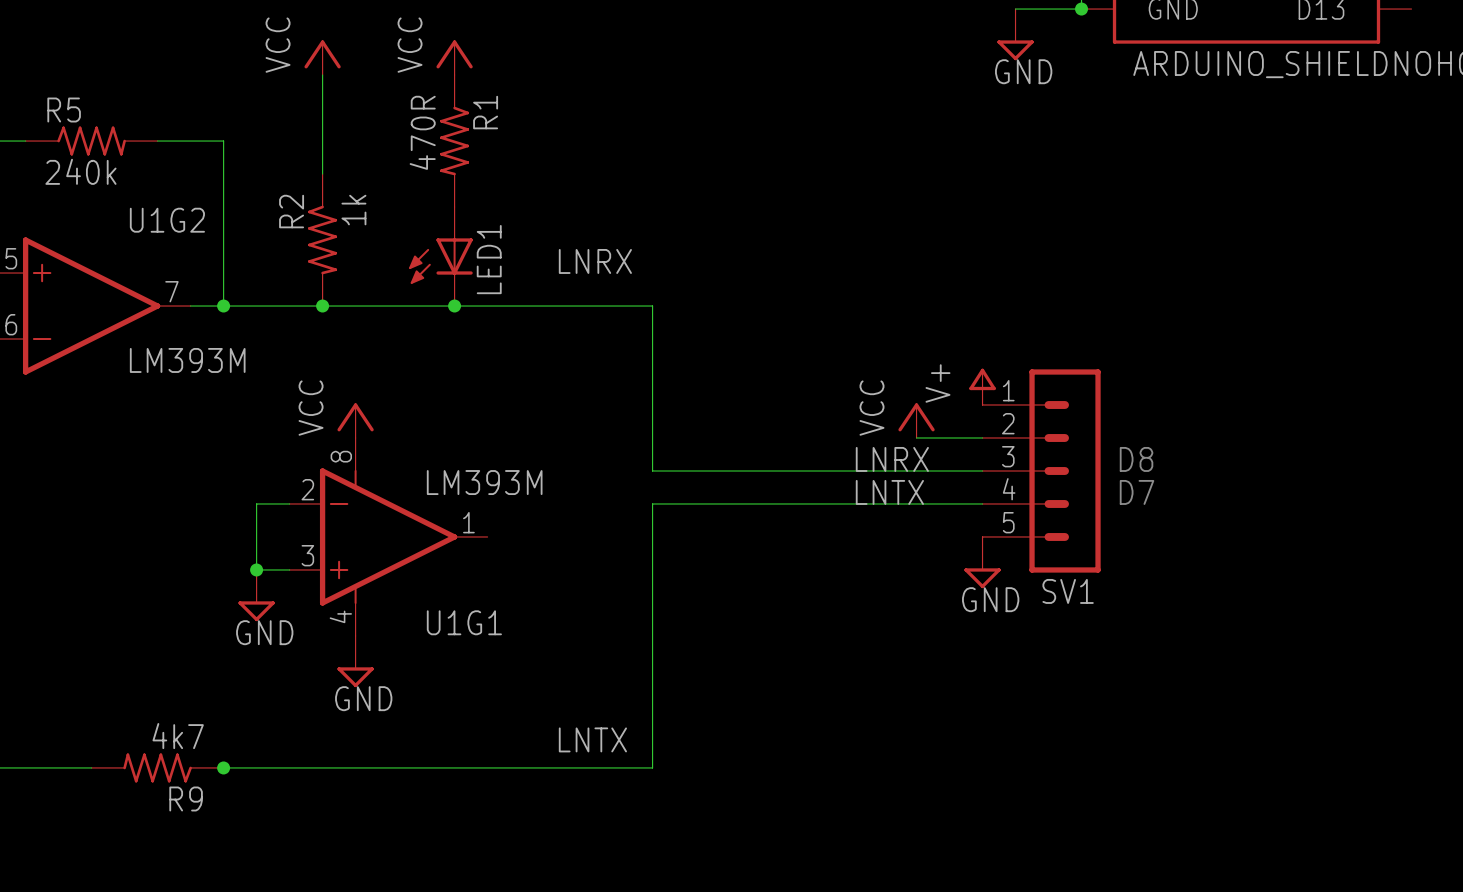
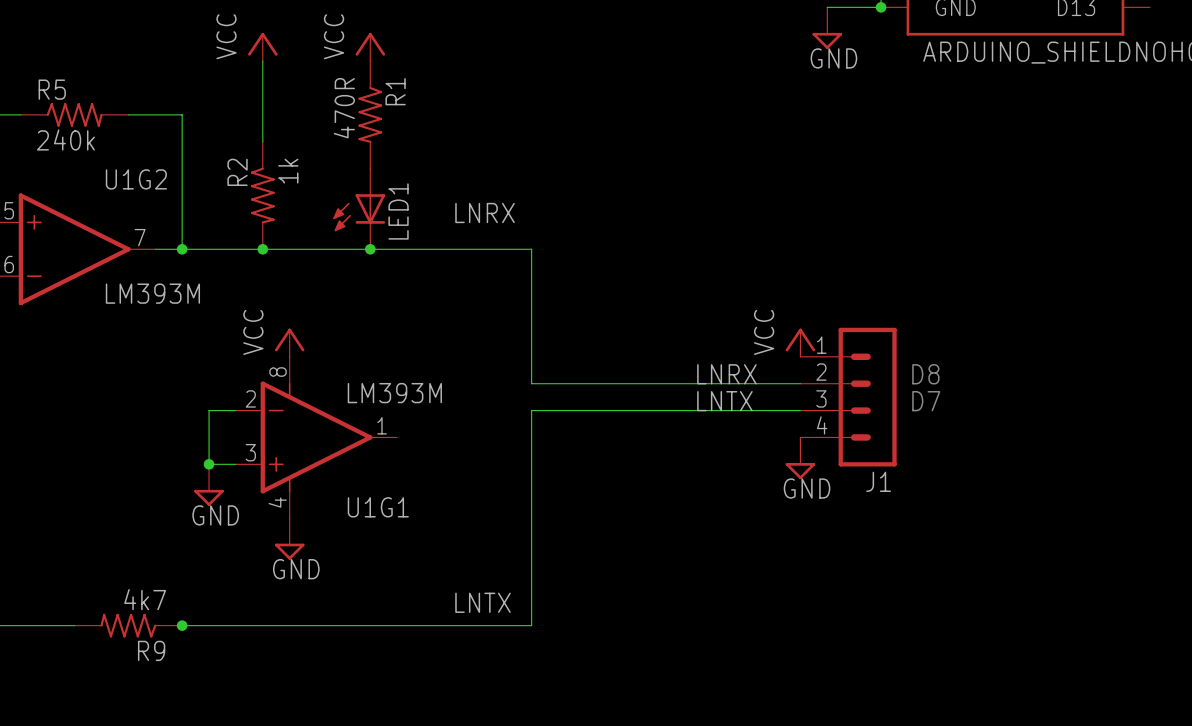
power symbol: V+ (982, 386) -> none
power symbol position: VCC (916, 420) -> VCC (800, 342)
wire: (916, 437) (982, 437) -> none
SV1: (1041, 470) -> none
J1: none -> (848, 397)

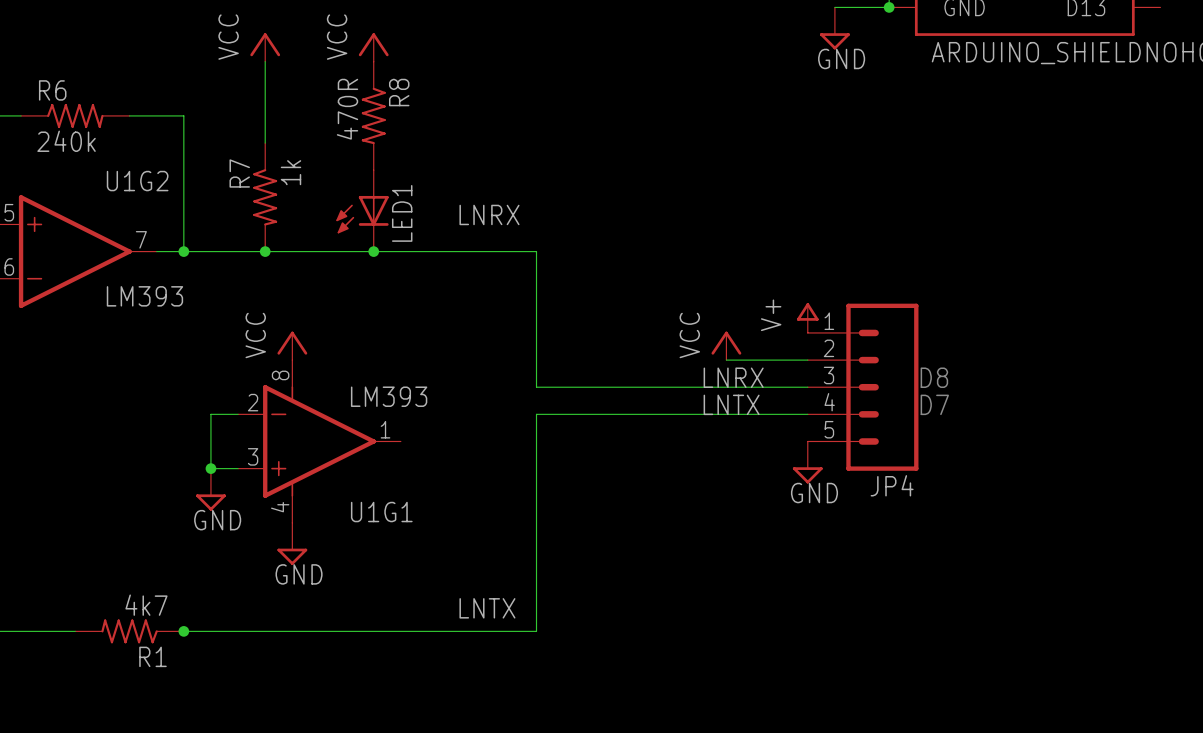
R5 name: R5 (52, 89) -> R6 (52, 90)
R1 name: R1 (395, 91) -> R8 (399, 92)
R2 name: R2 (237, 172) -> R7 (239, 173)
U1G2 value: LM393M (152, 293) -> LM393 (144, 296)
power symbol: none -> V+ (807, 318)
power symbol position: VCC (800, 342) -> VCC (726, 345)
wire: none -> (726, 360) (807, 360)
JP4: none -> (863, 387)
U1G1 value: LM393M (394, 393) -> LM393 (389, 396)
J1: (848, 397) -> none
R9 name: R9 (151, 650) -> R1 (152, 656)

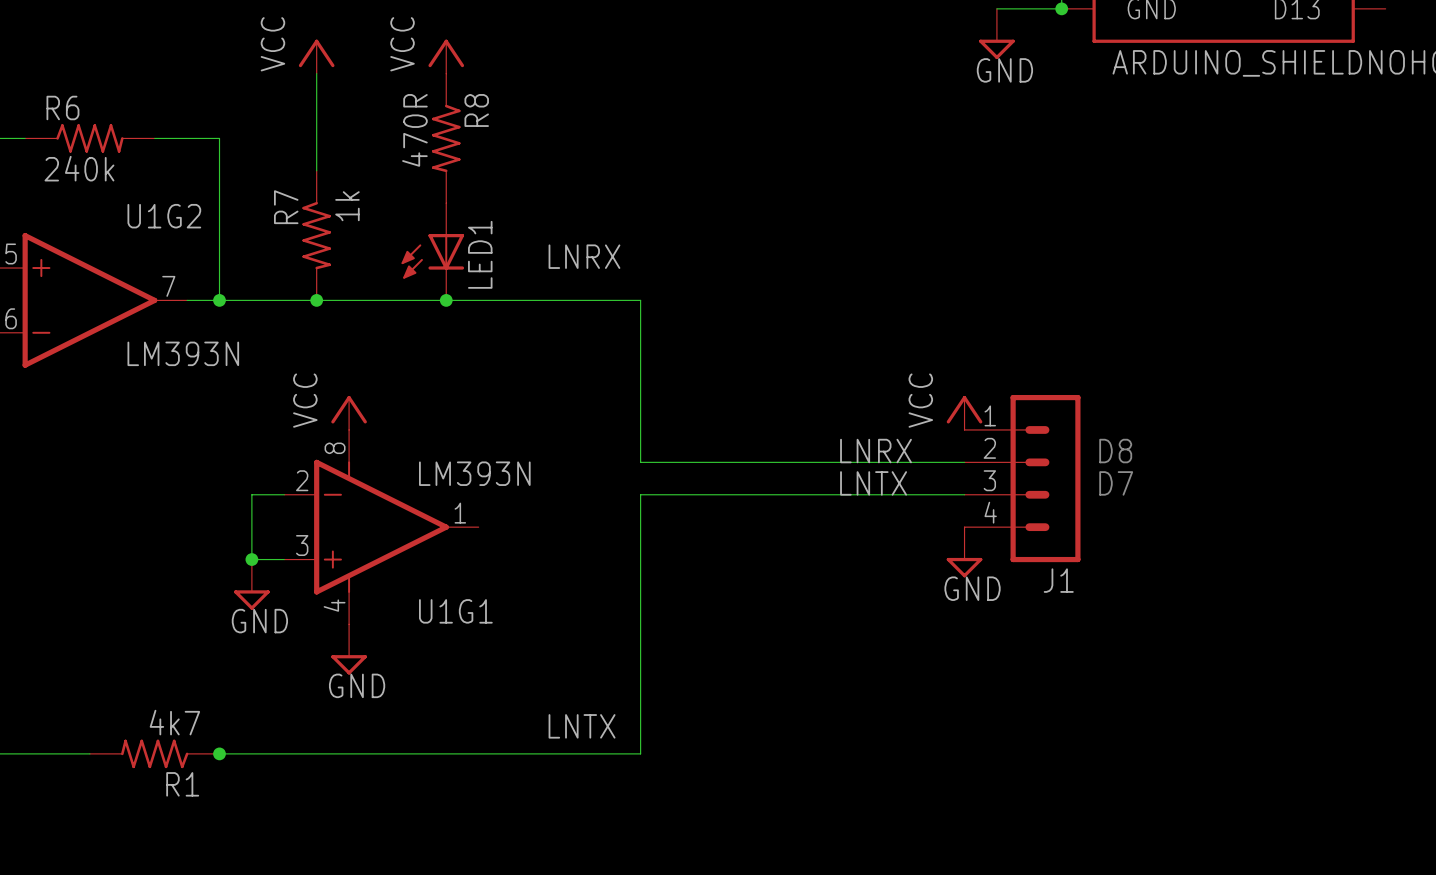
U1G2 value: LM393 (144, 296) -> LM393N (183, 353)
power symbol: V+ (807, 318) -> none
power symbol position: VCC (726, 345) -> VCC (964, 412)
wire: (726, 360) (807, 360) -> none
JP4: (863, 387) -> none
U1G1 value: LM393 (389, 396) -> LM393N (474, 473)
J1: none -> (1022, 478)

